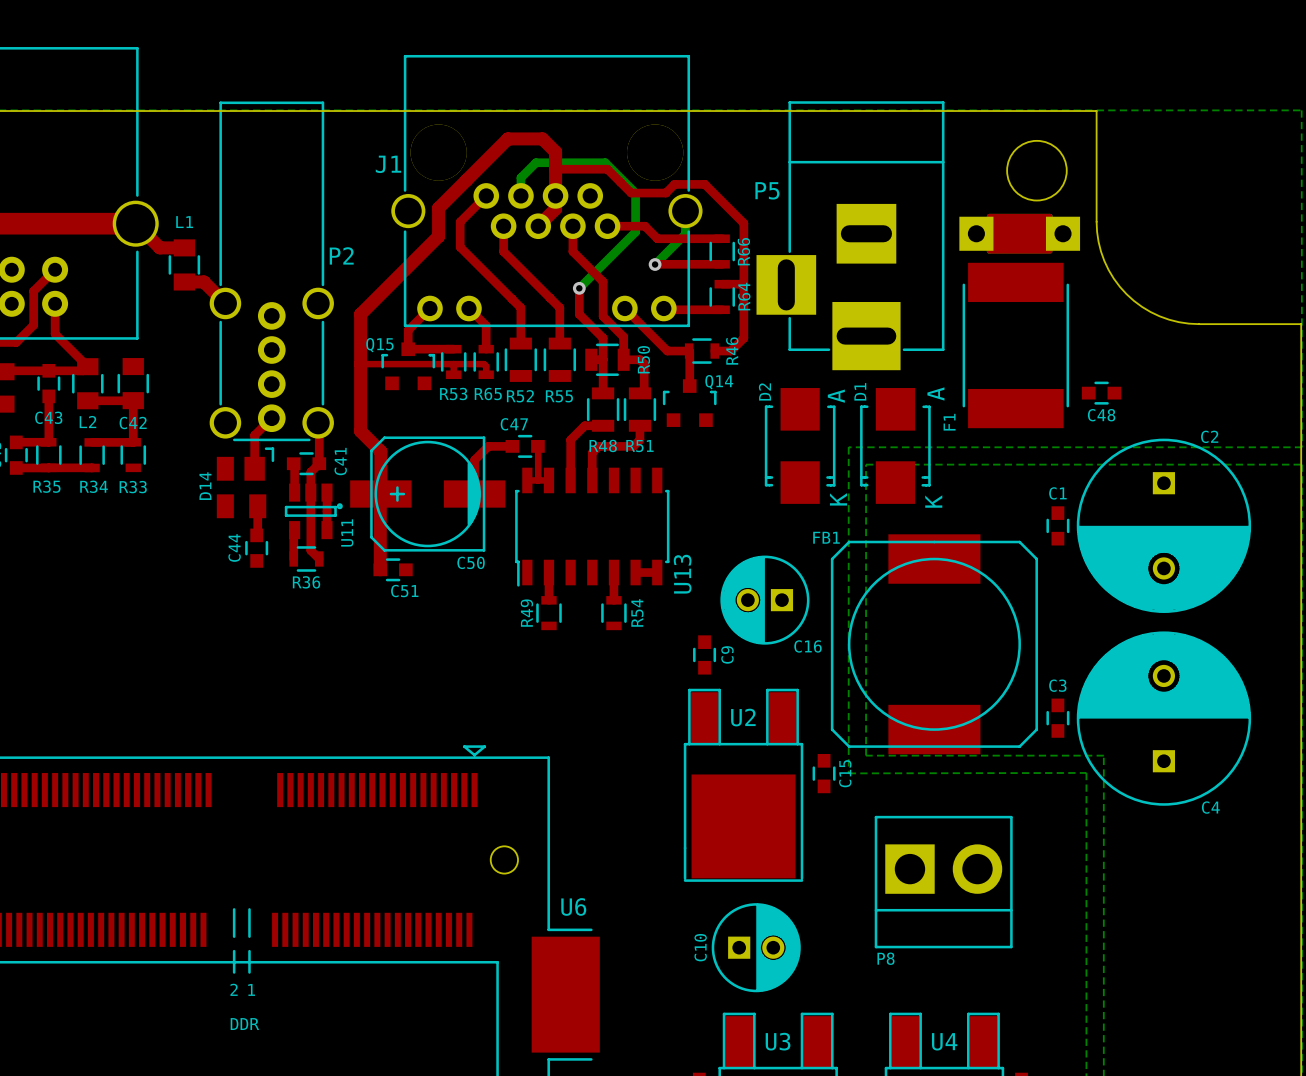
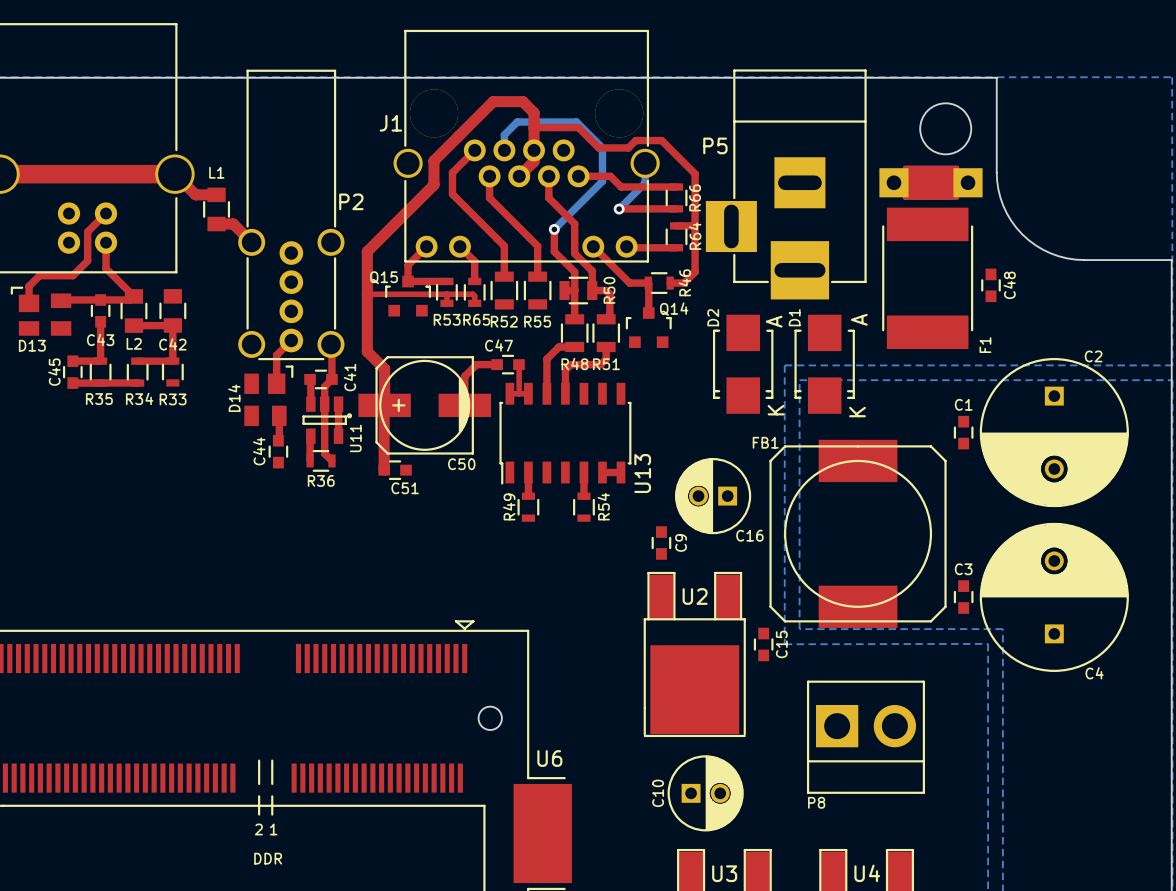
C48 rotation: 0° (1101, 393) -> 90° clockwise (991, 285)
C48 position: (1101, 393) -> (991, 285)
F1 name position: F1 (949, 422) -> F1 (985, 345)

